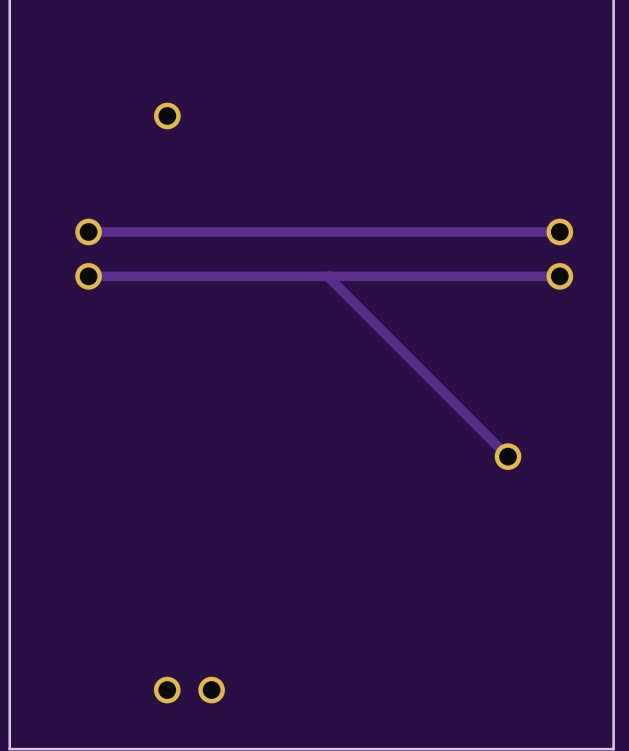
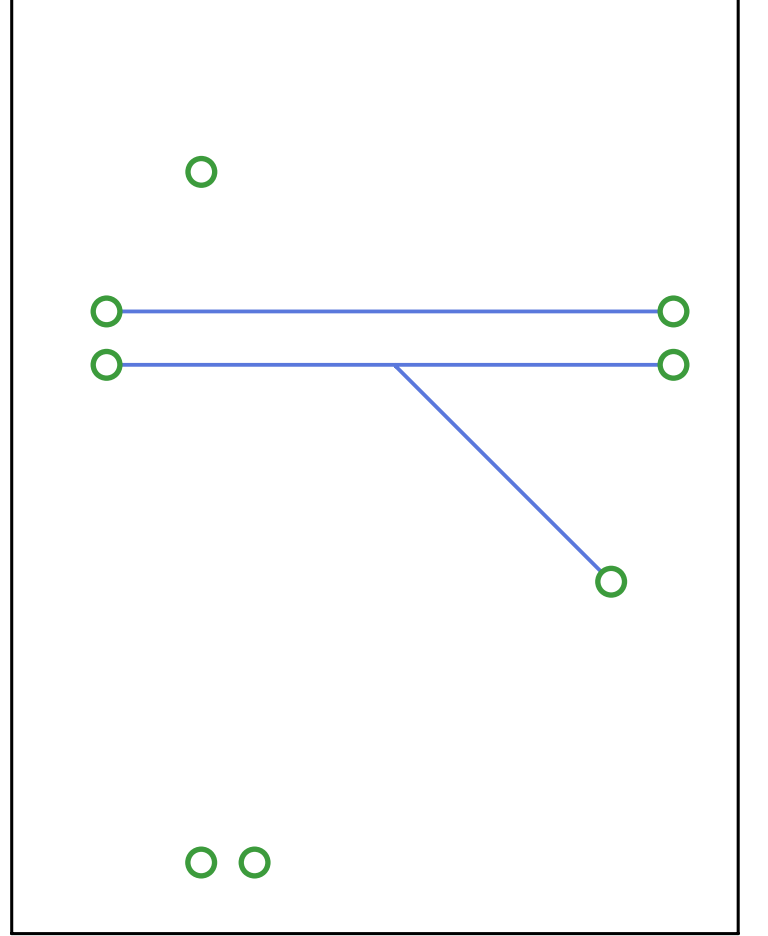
track width: thick (559, 231) (88, 231) -> thin (673, 311) (106, 311)
track width: thick (328, 276) (508, 456) -> thin (395, 364) (611, 581)
track width: thick (559, 276) (88, 276) -> thin (673, 364) (106, 364)

